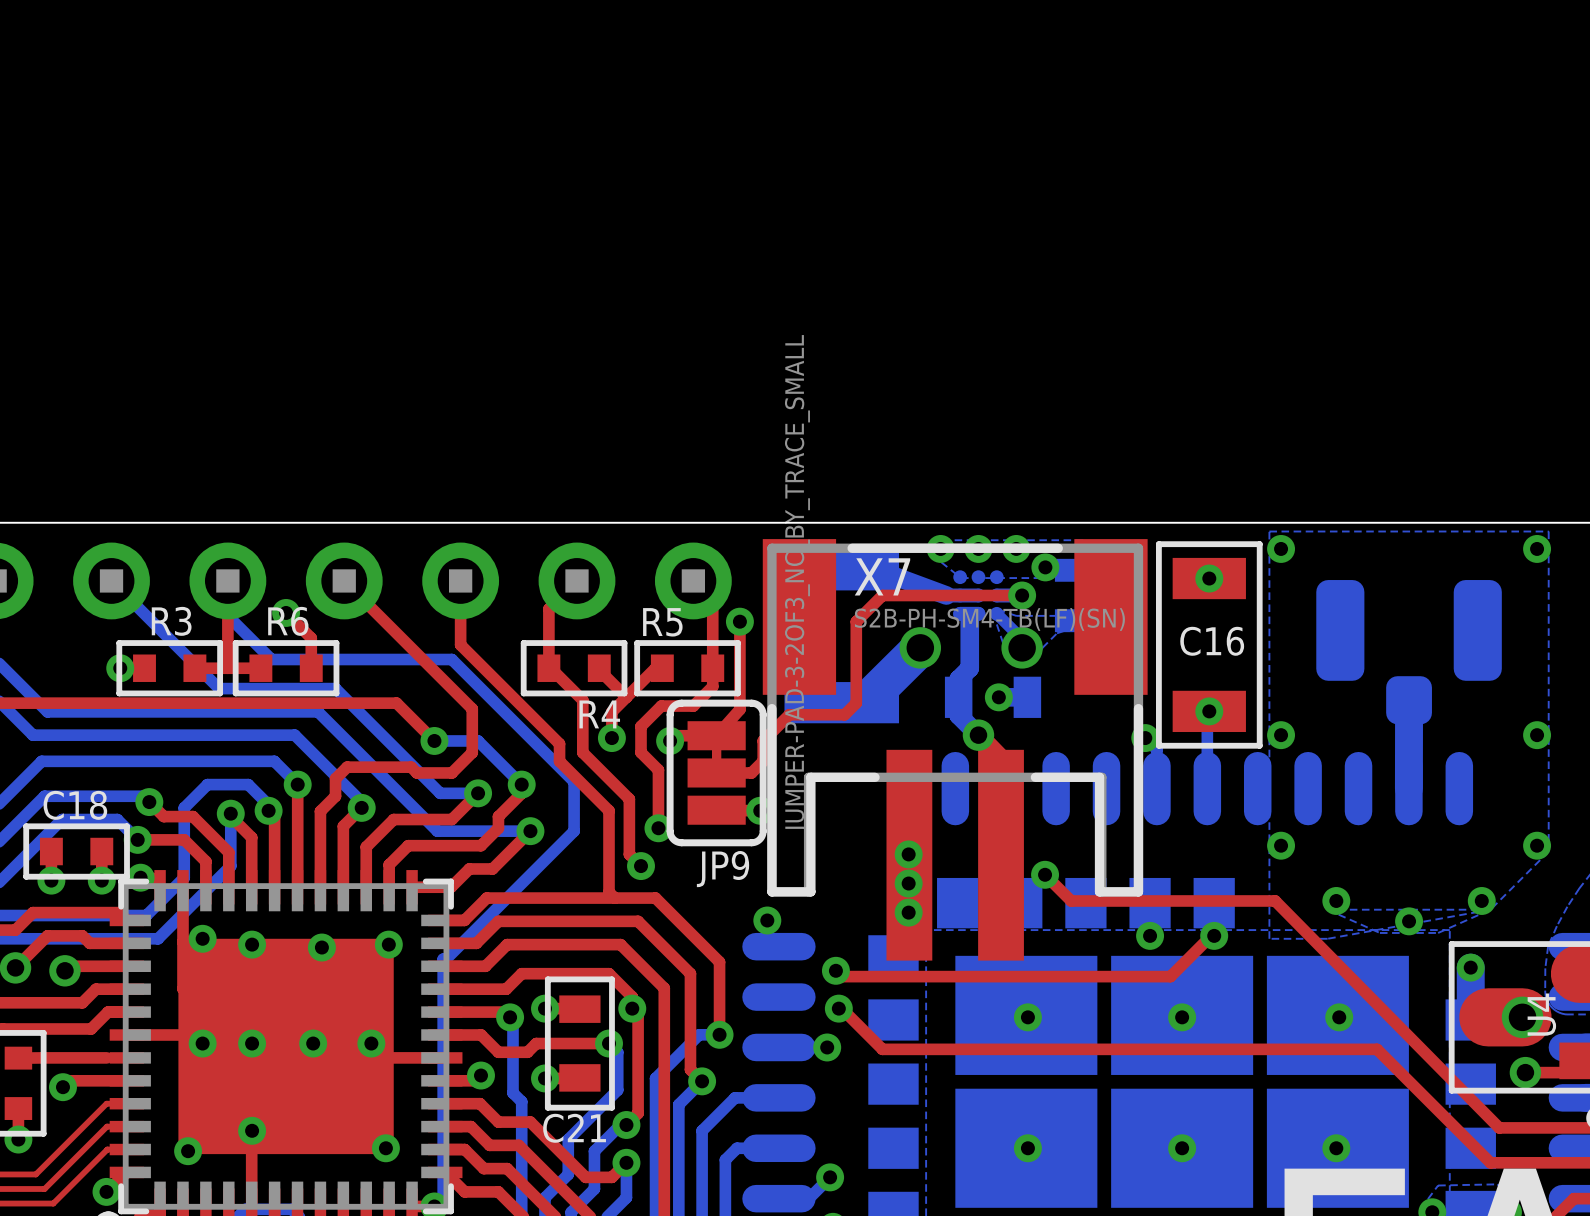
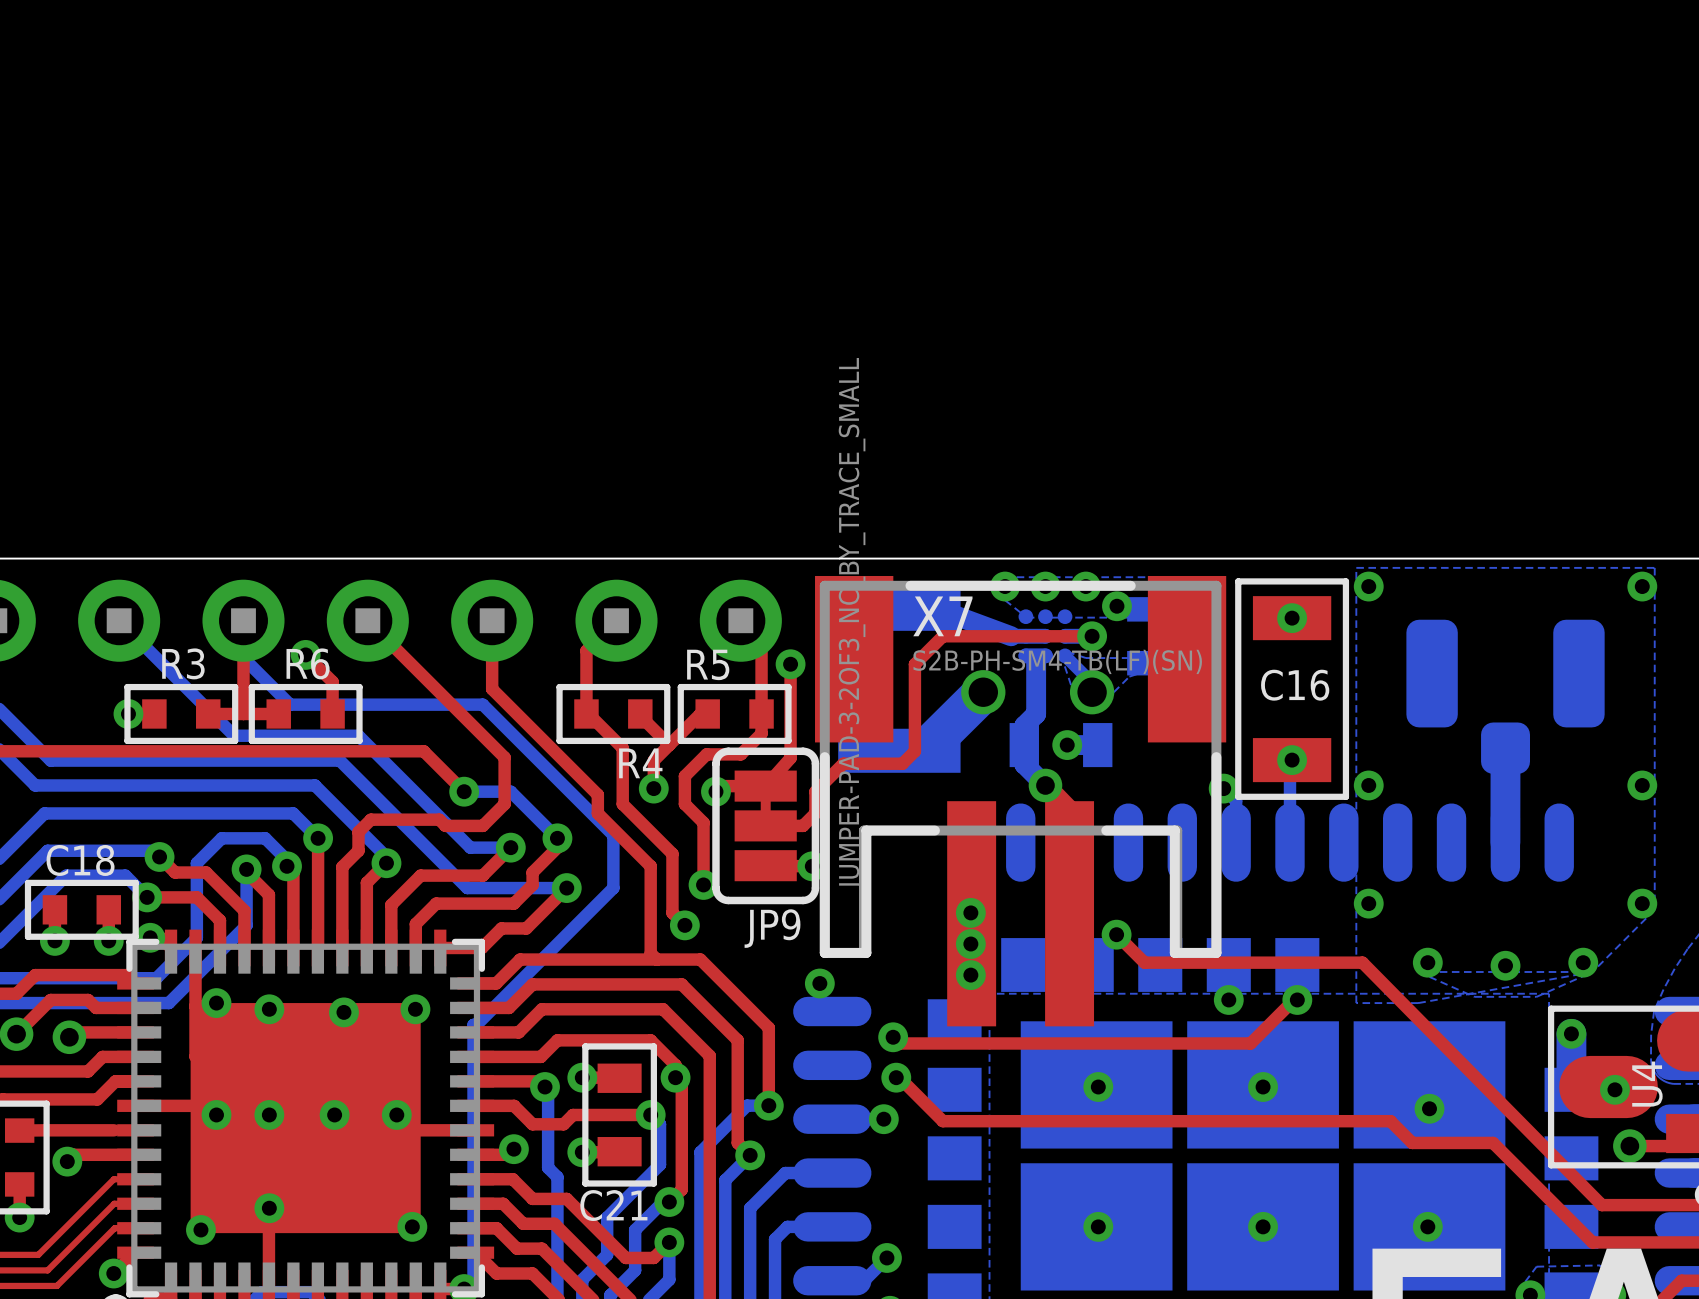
via position: (1409, 921) -> (1505, 965)
via size: [1501, 996, 1544, 1039] -> [1600, 1074, 1630, 1105]
via position: (1339, 1017) -> (1429, 1108)
top track: (1301, 1049) (1377, 1049) (1397, 1069) -> (1390, 1121) (1412, 1142) (1493, 1142)

